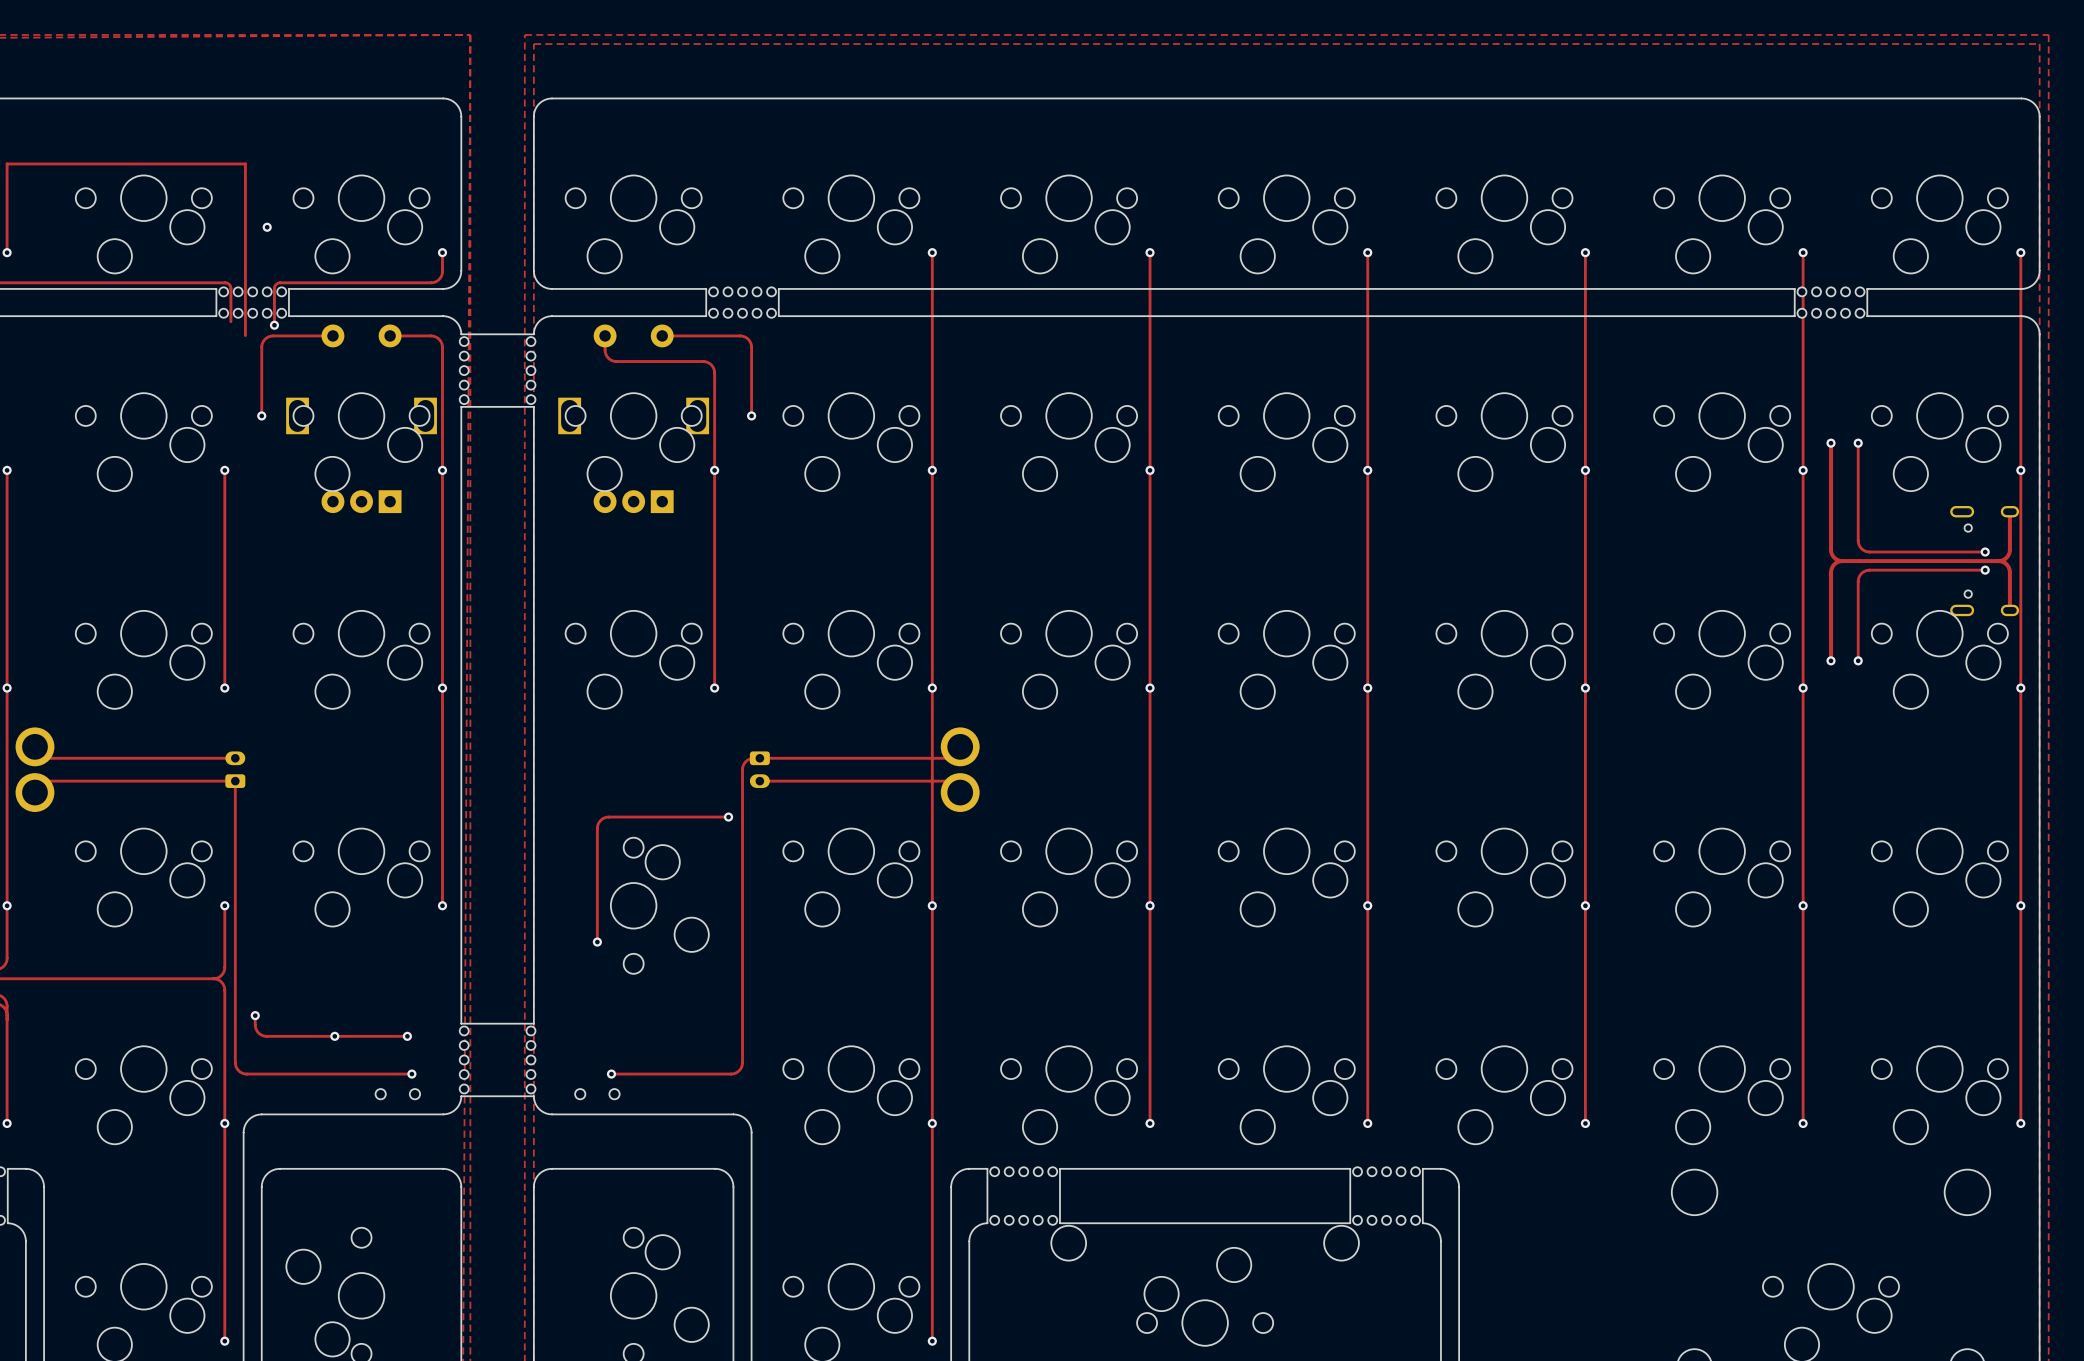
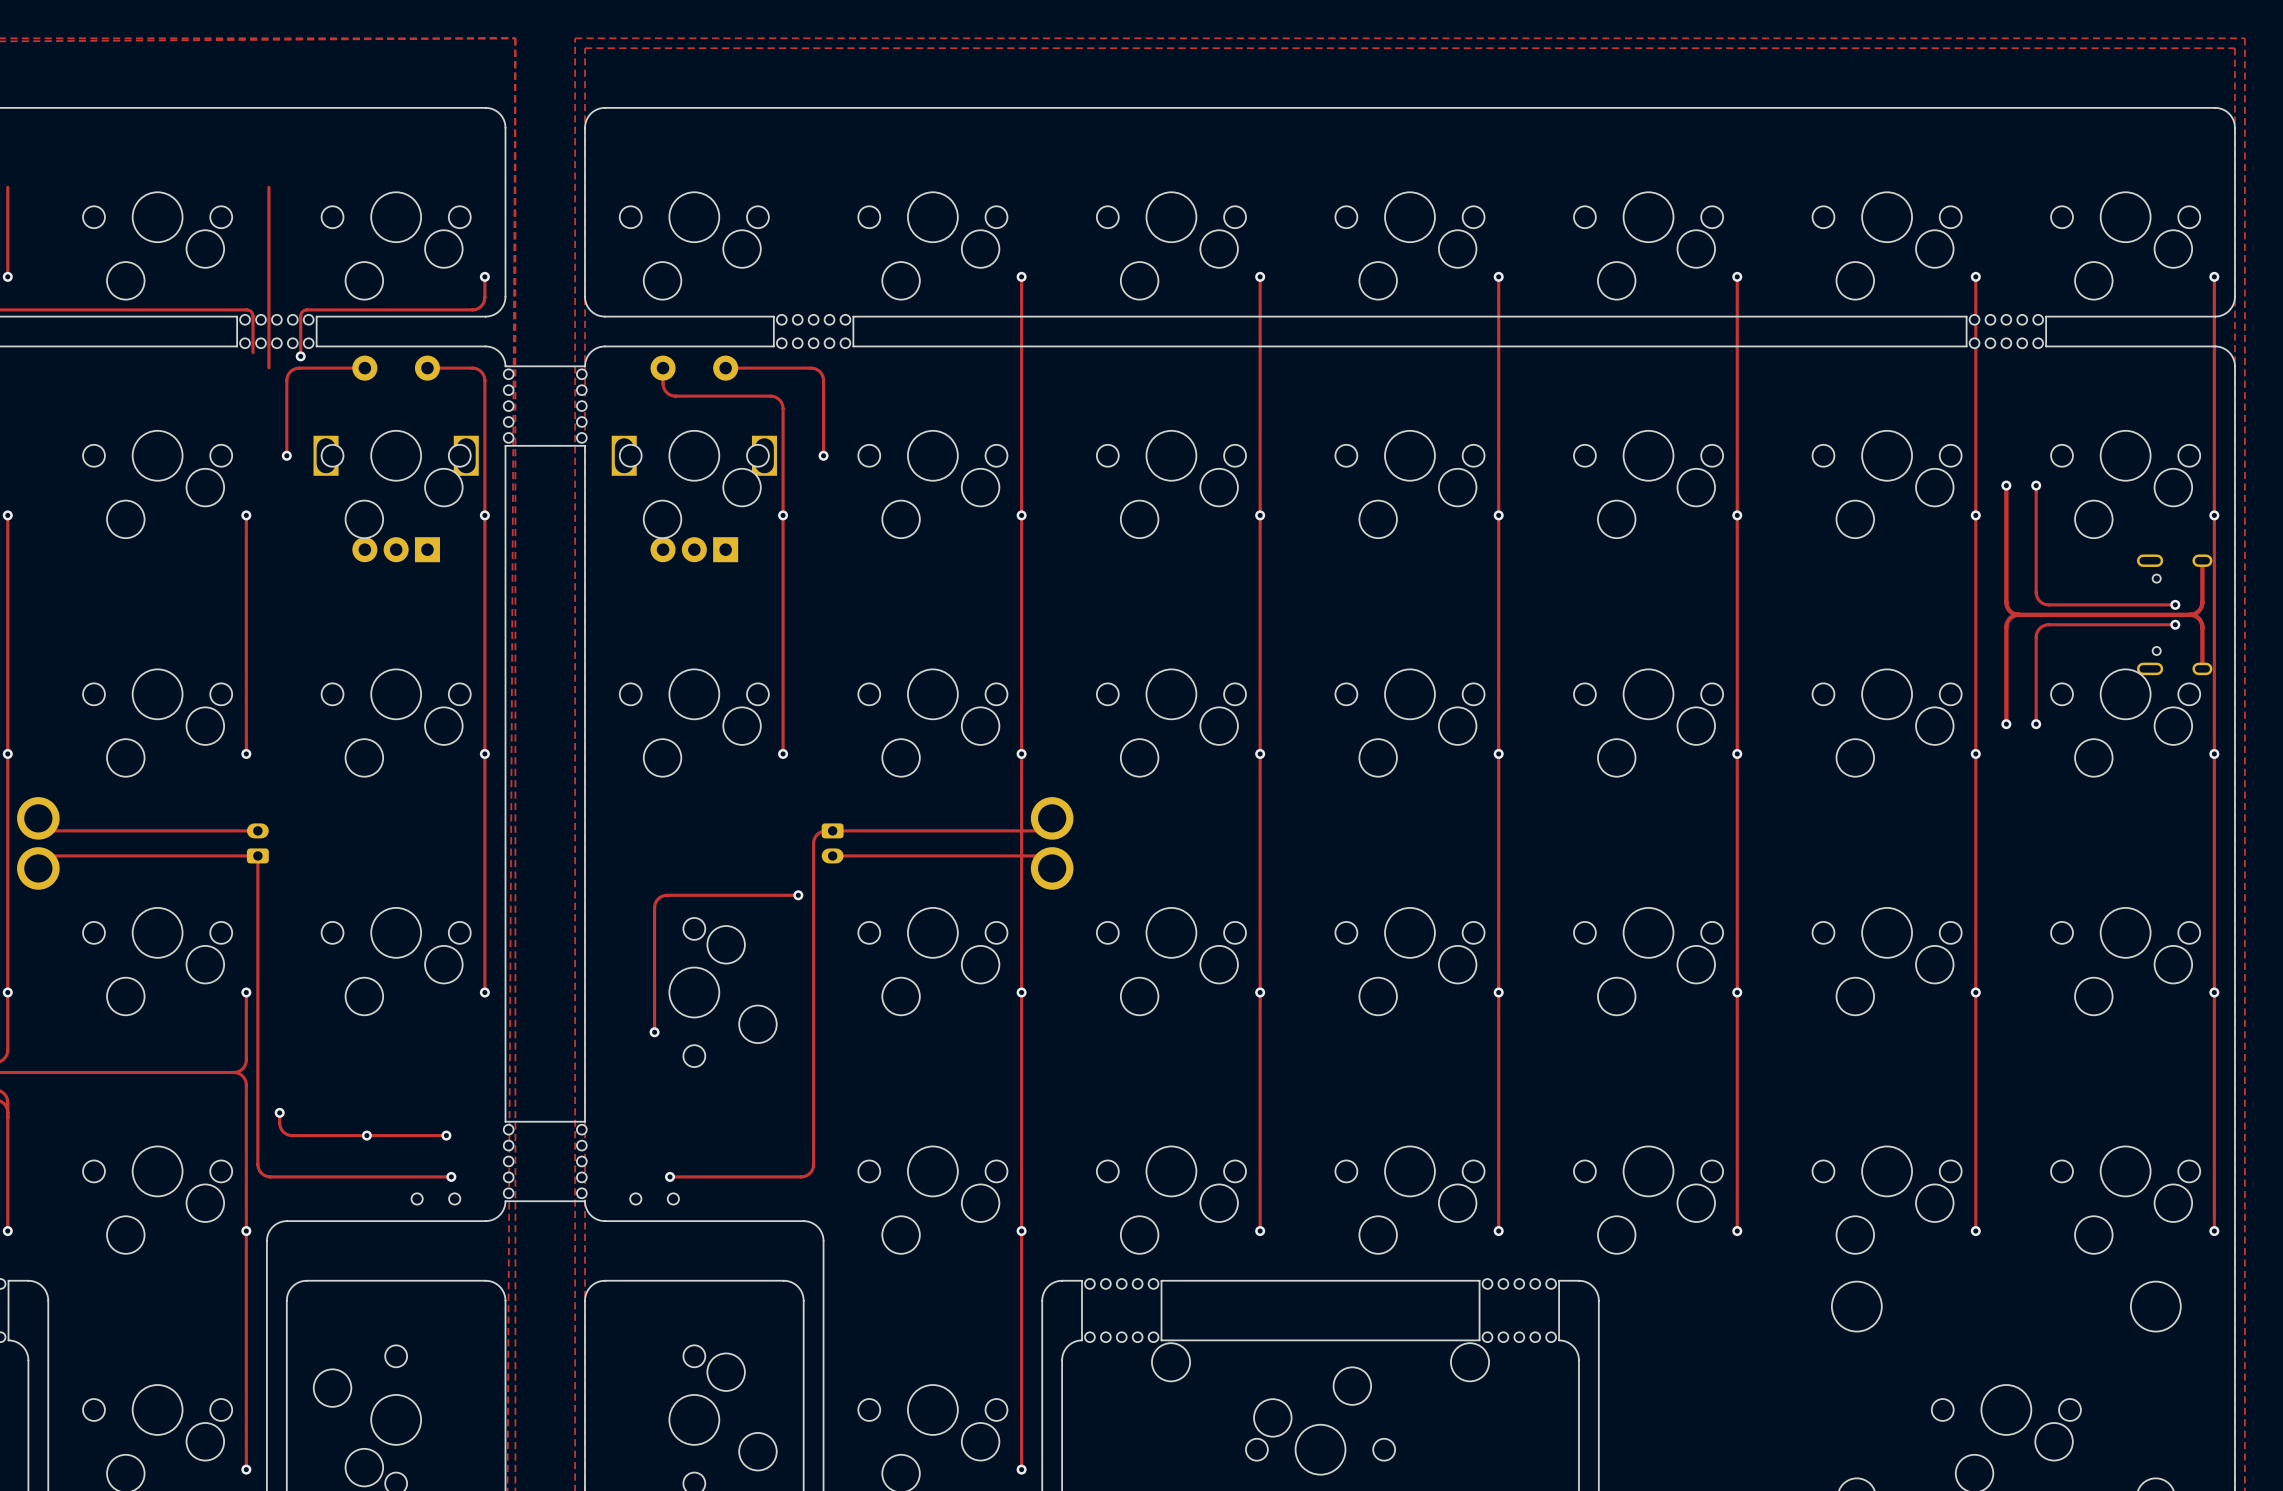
track: (7, 171) (7, 163) (245, 163) (245, 171) -> none
via: (267, 227) -> none

